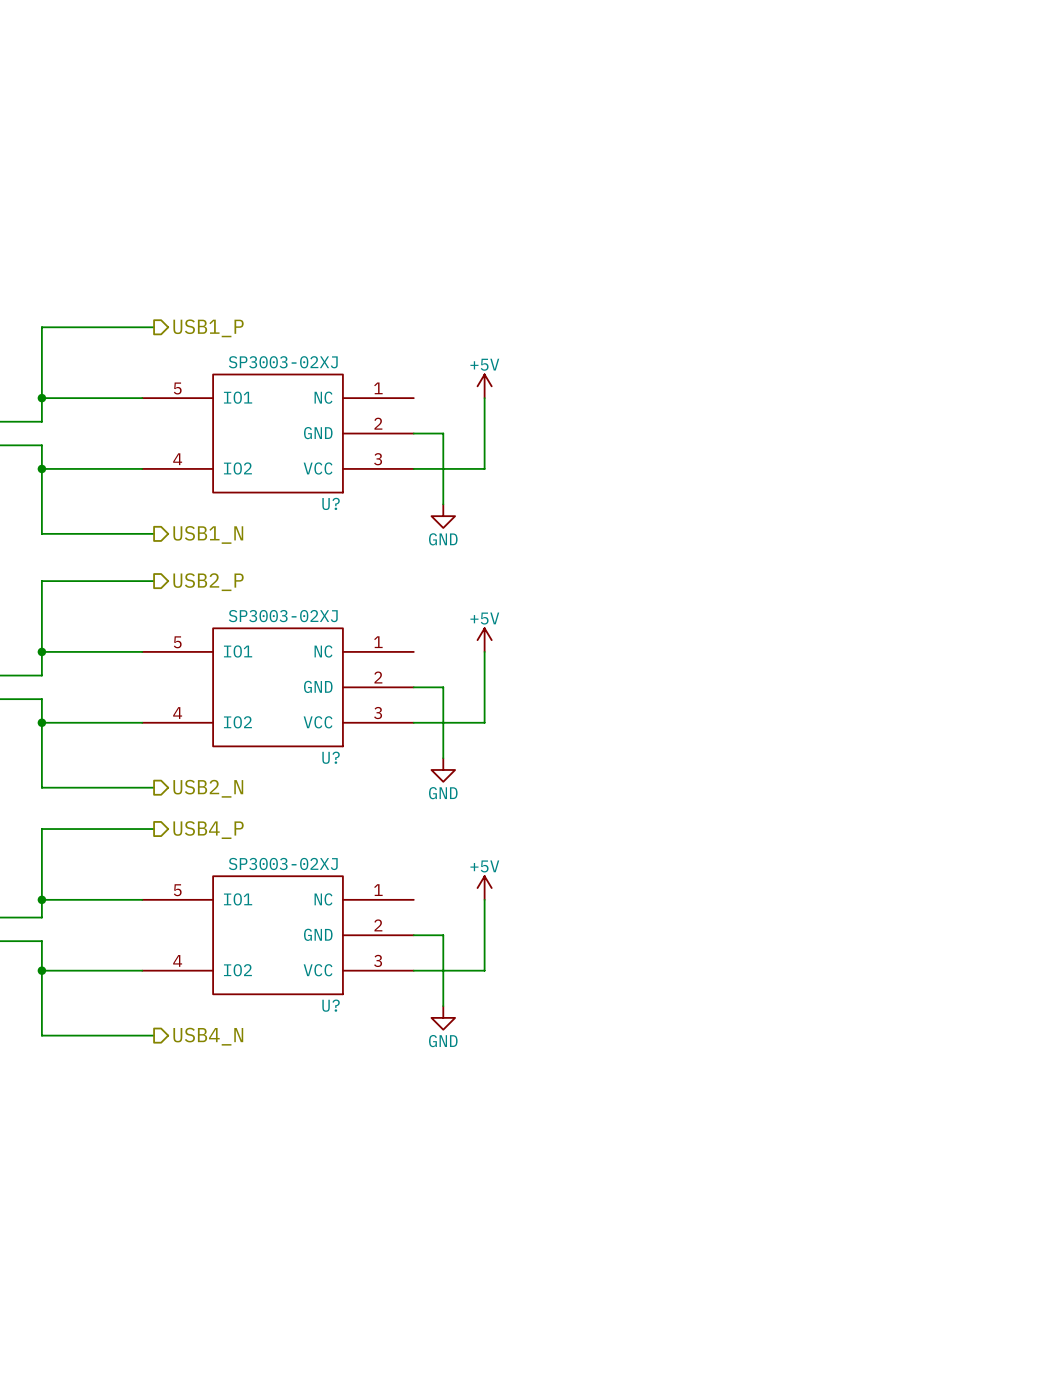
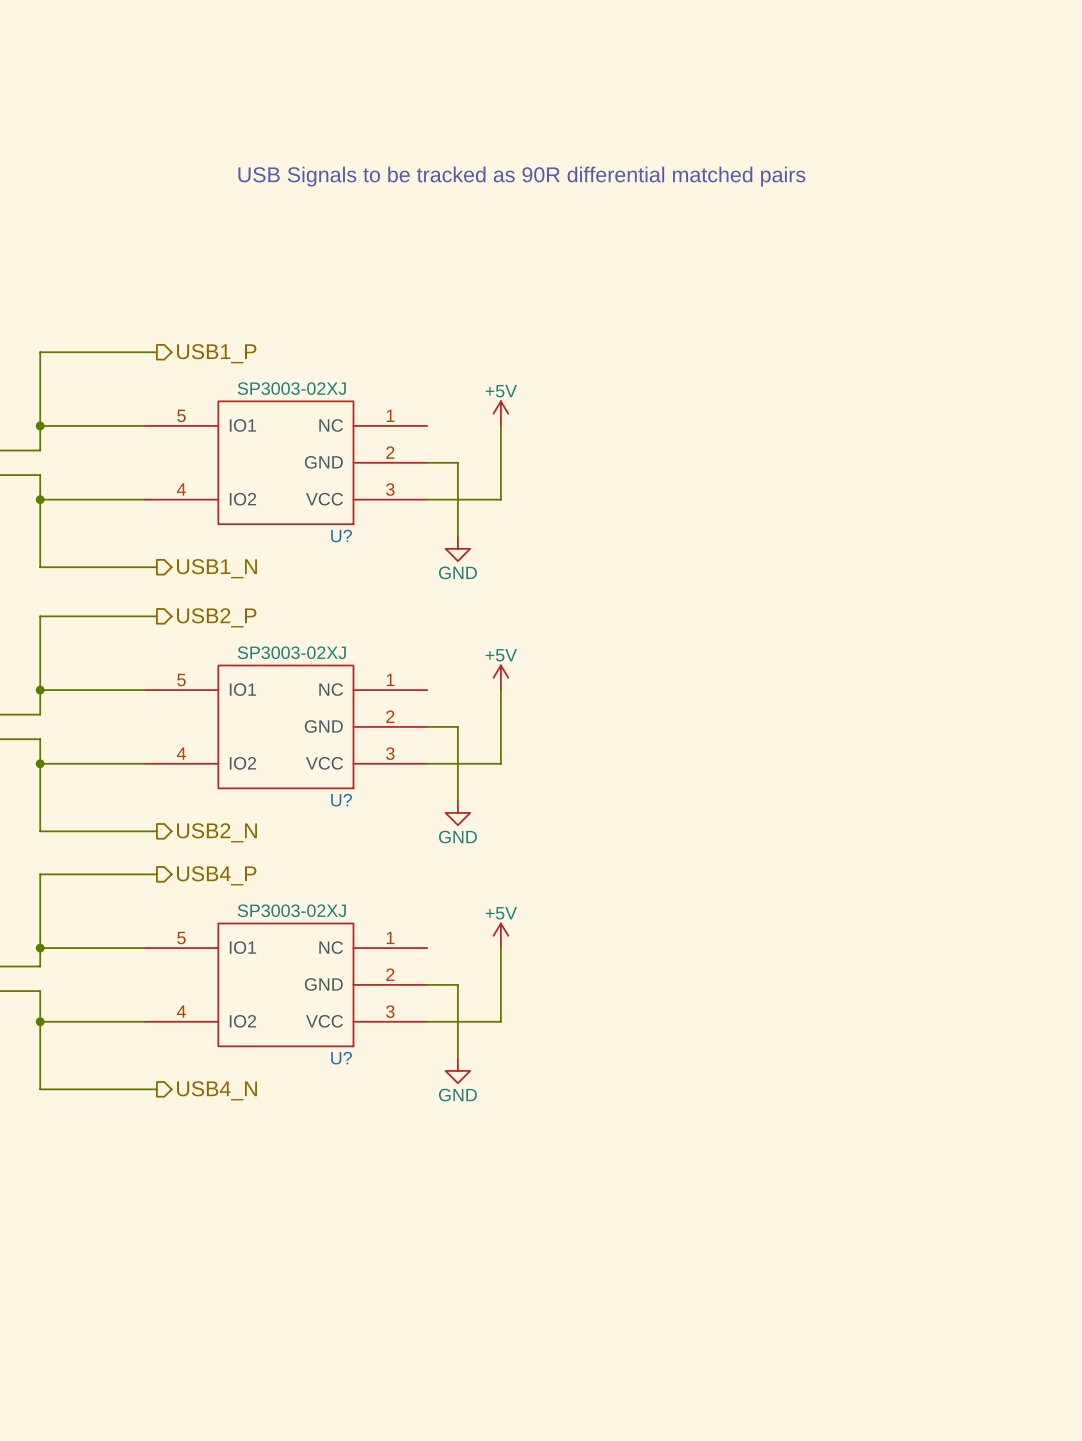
text: none -> USB Signals to be tracked as 90R differential matched pairs (521, 176)

